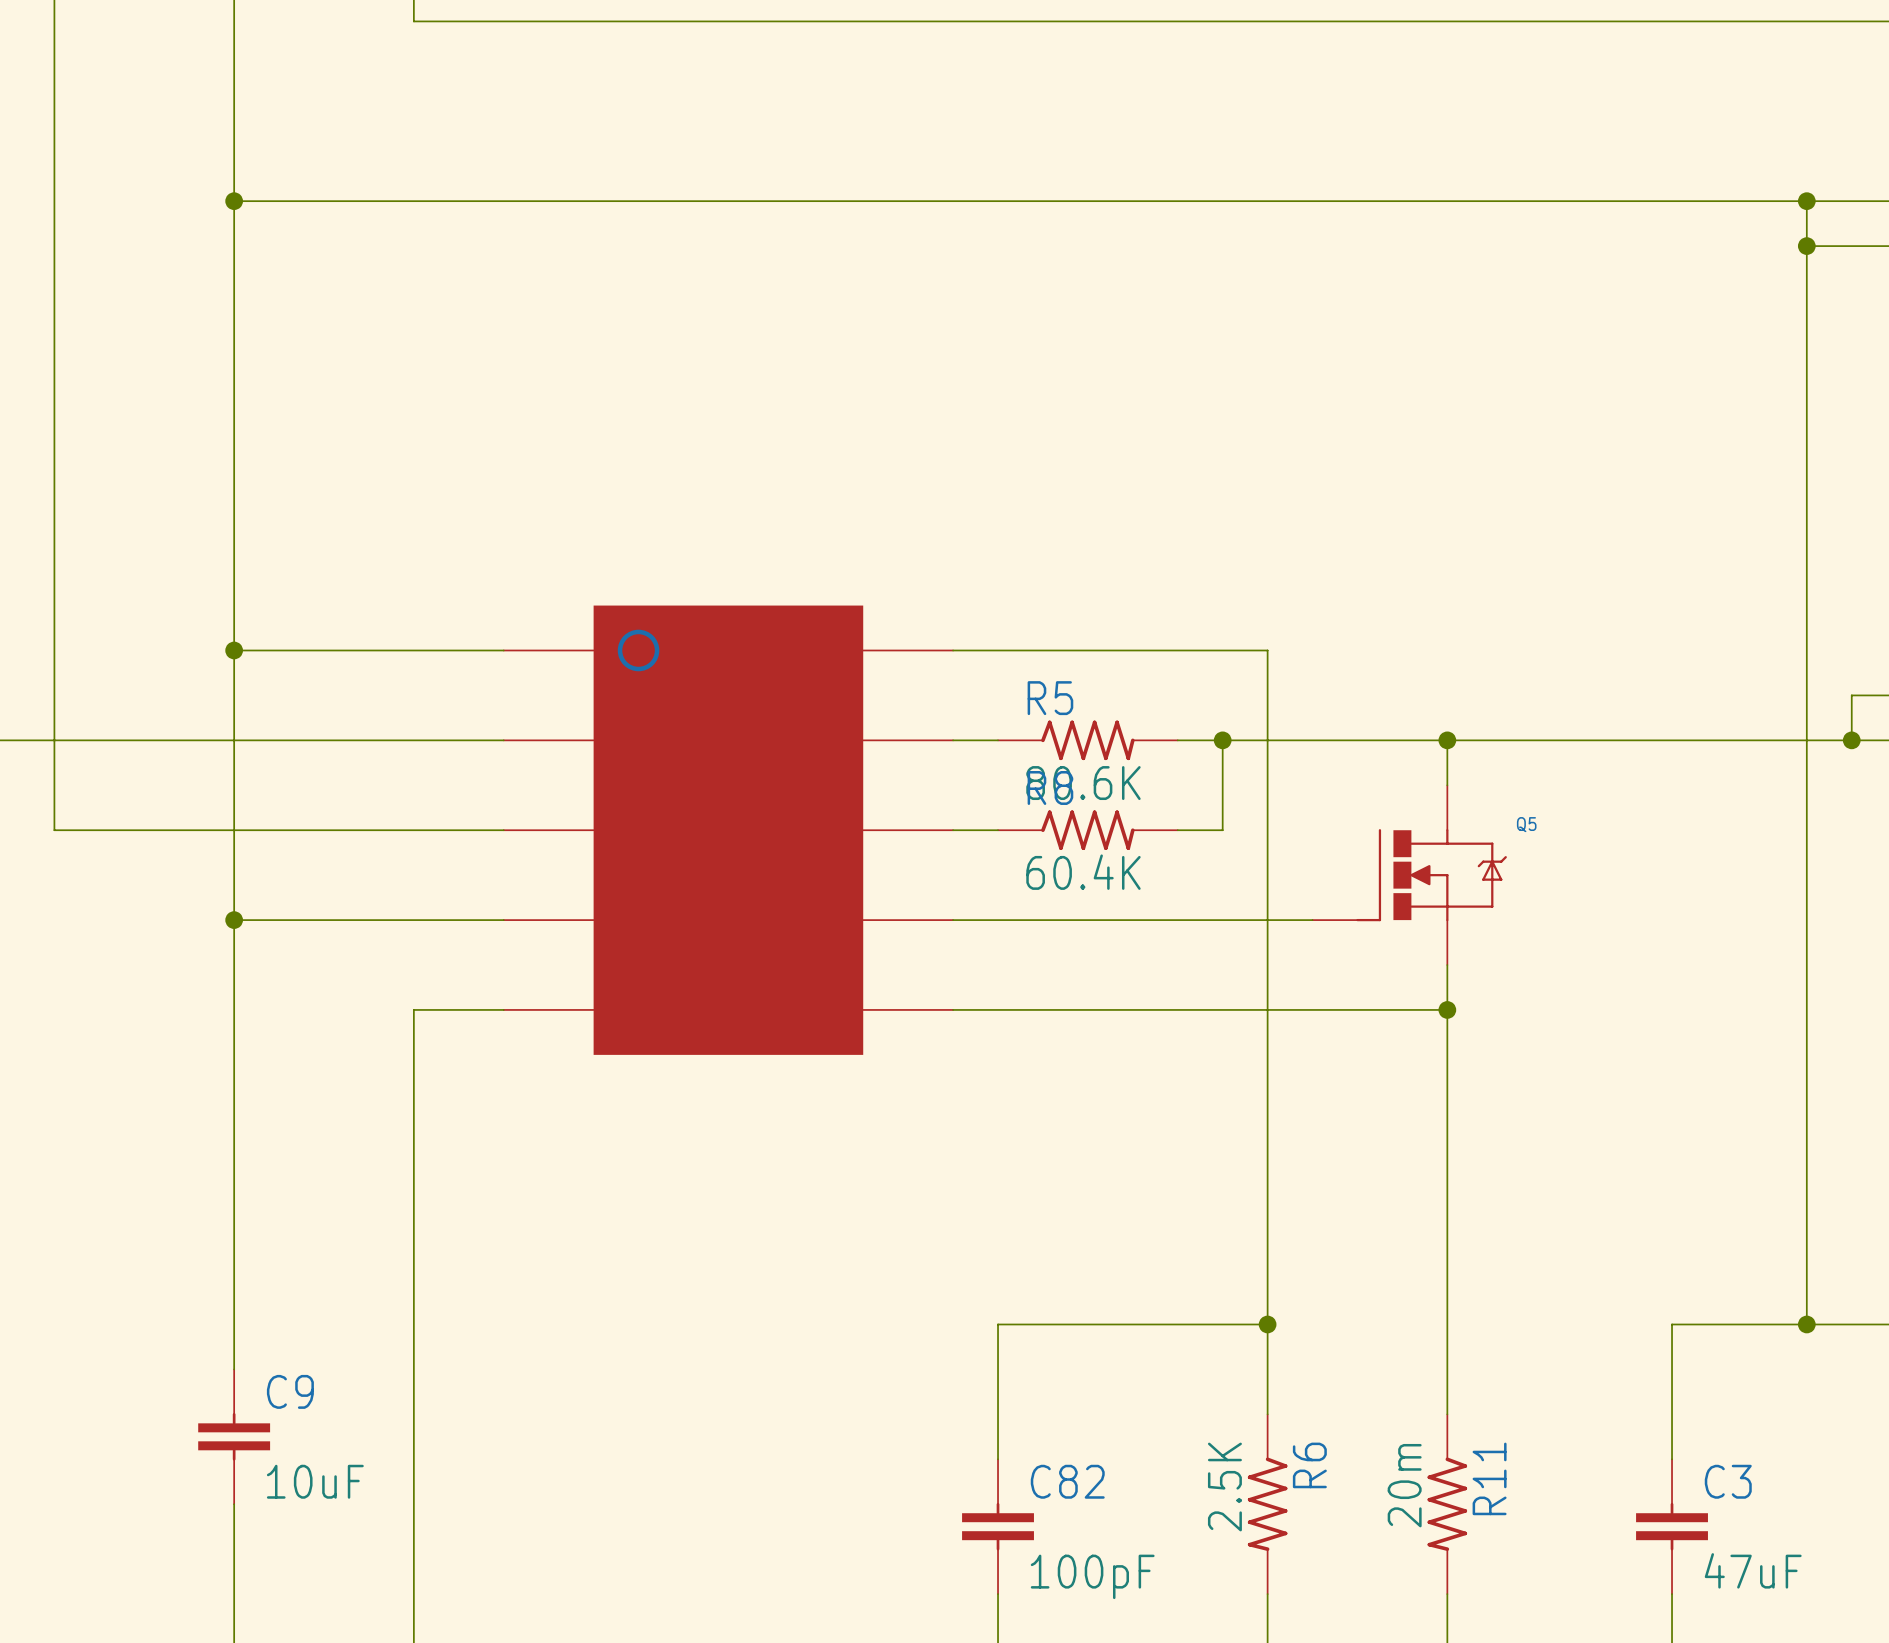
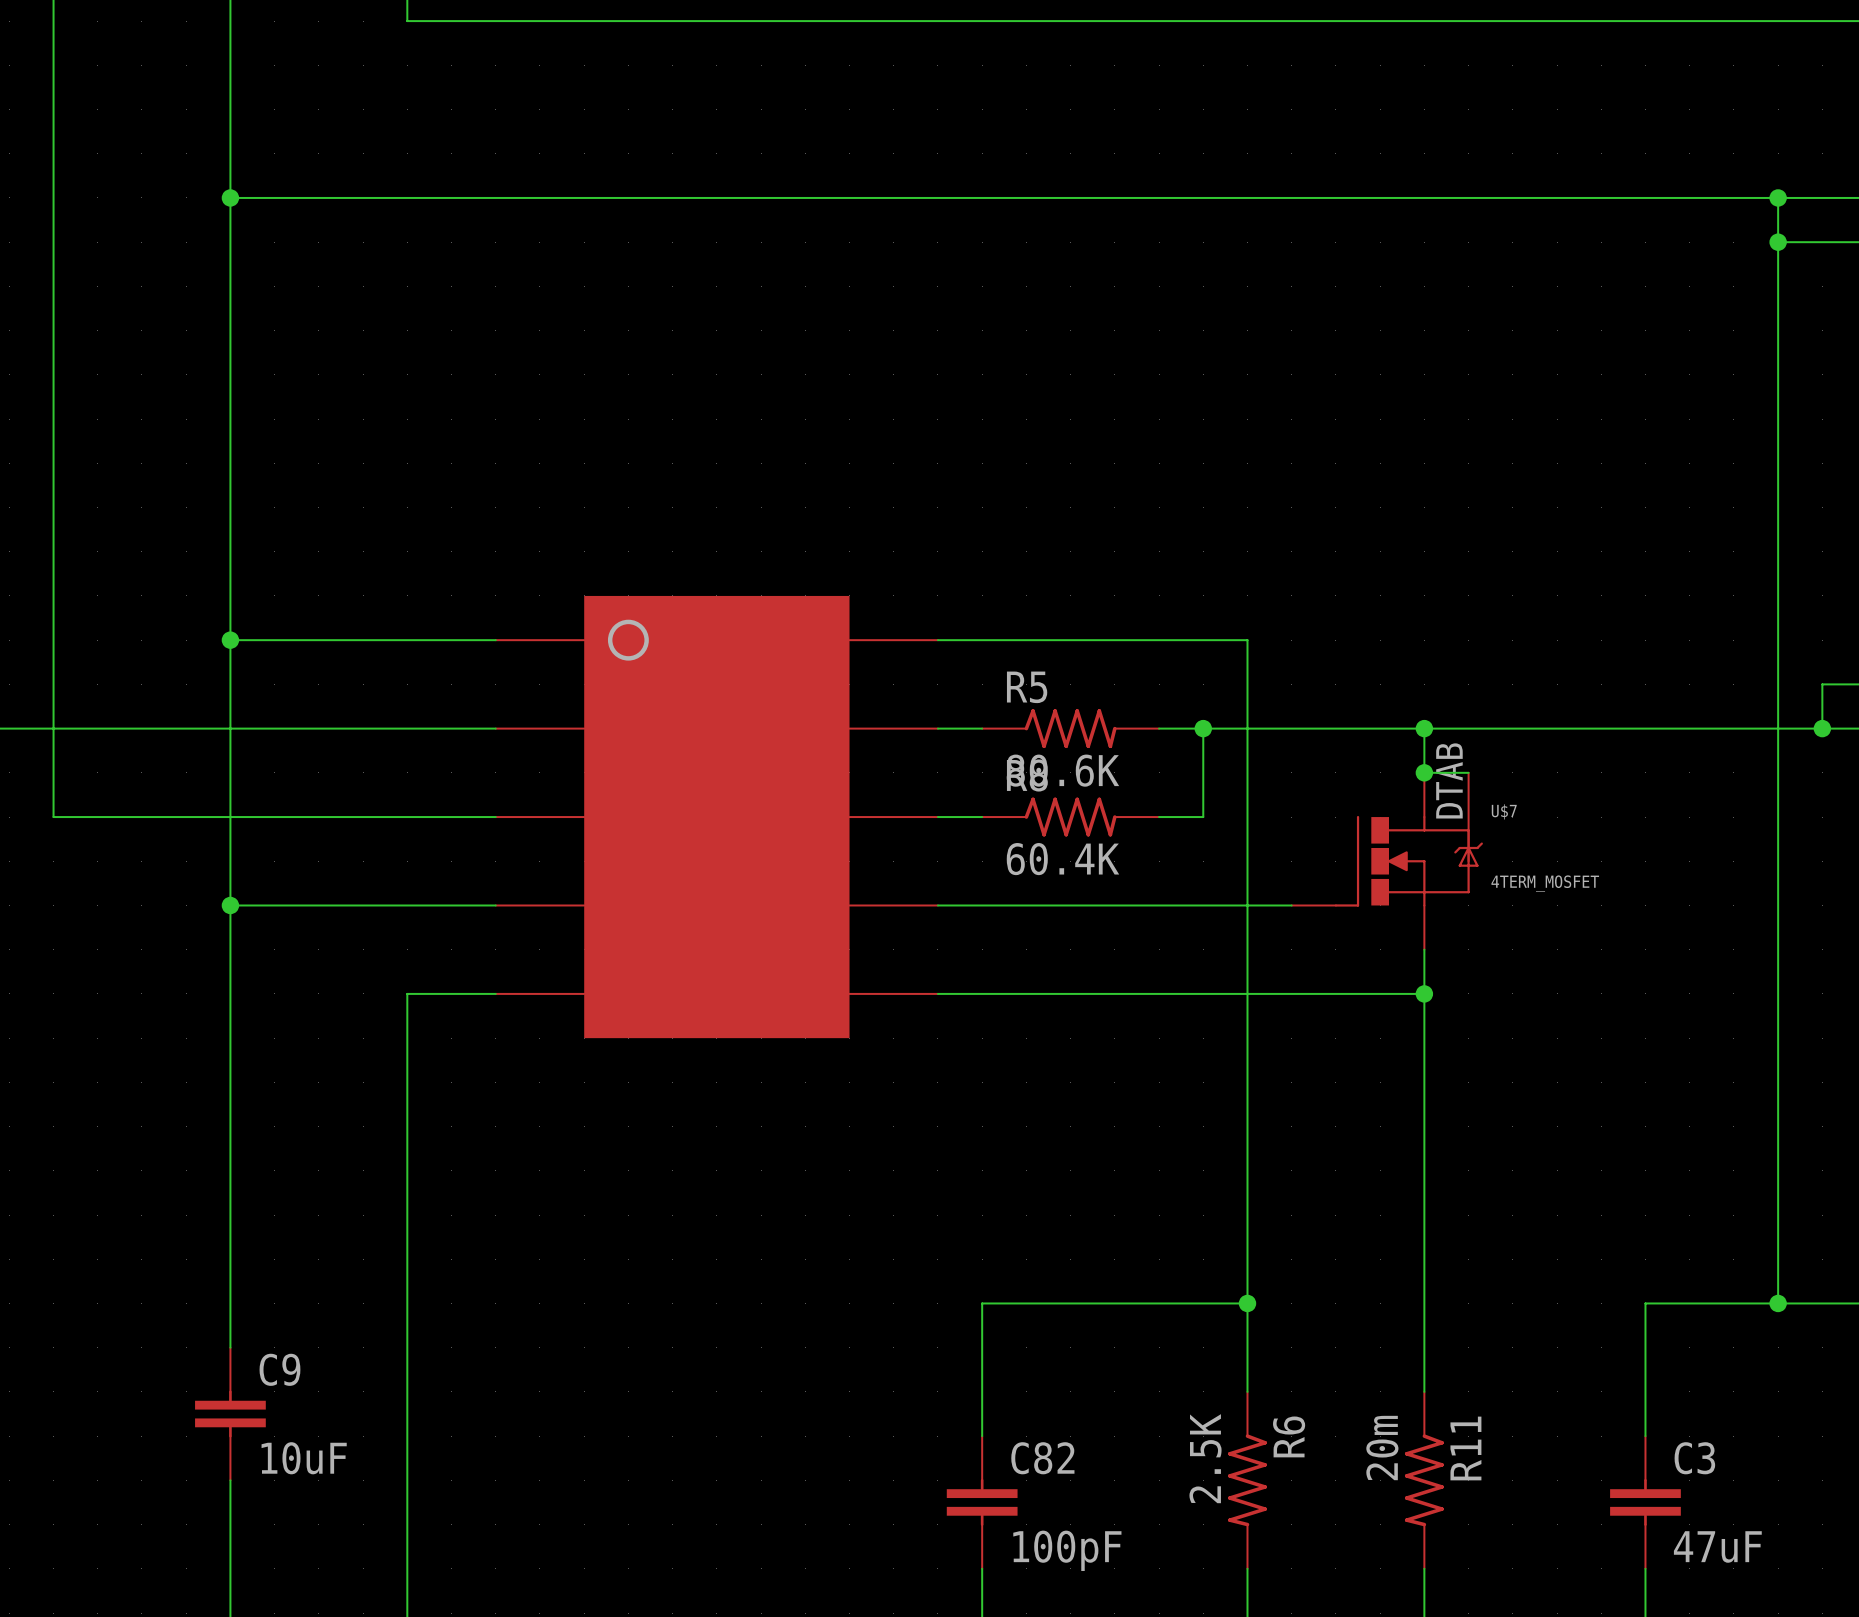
wire: none -> (1424, 772) (1468, 772)
junction: none -> (1424, 772)
Q5: (1409, 875) -> none
U$7: none -> 4TERM_MOSFET (1387, 861)

